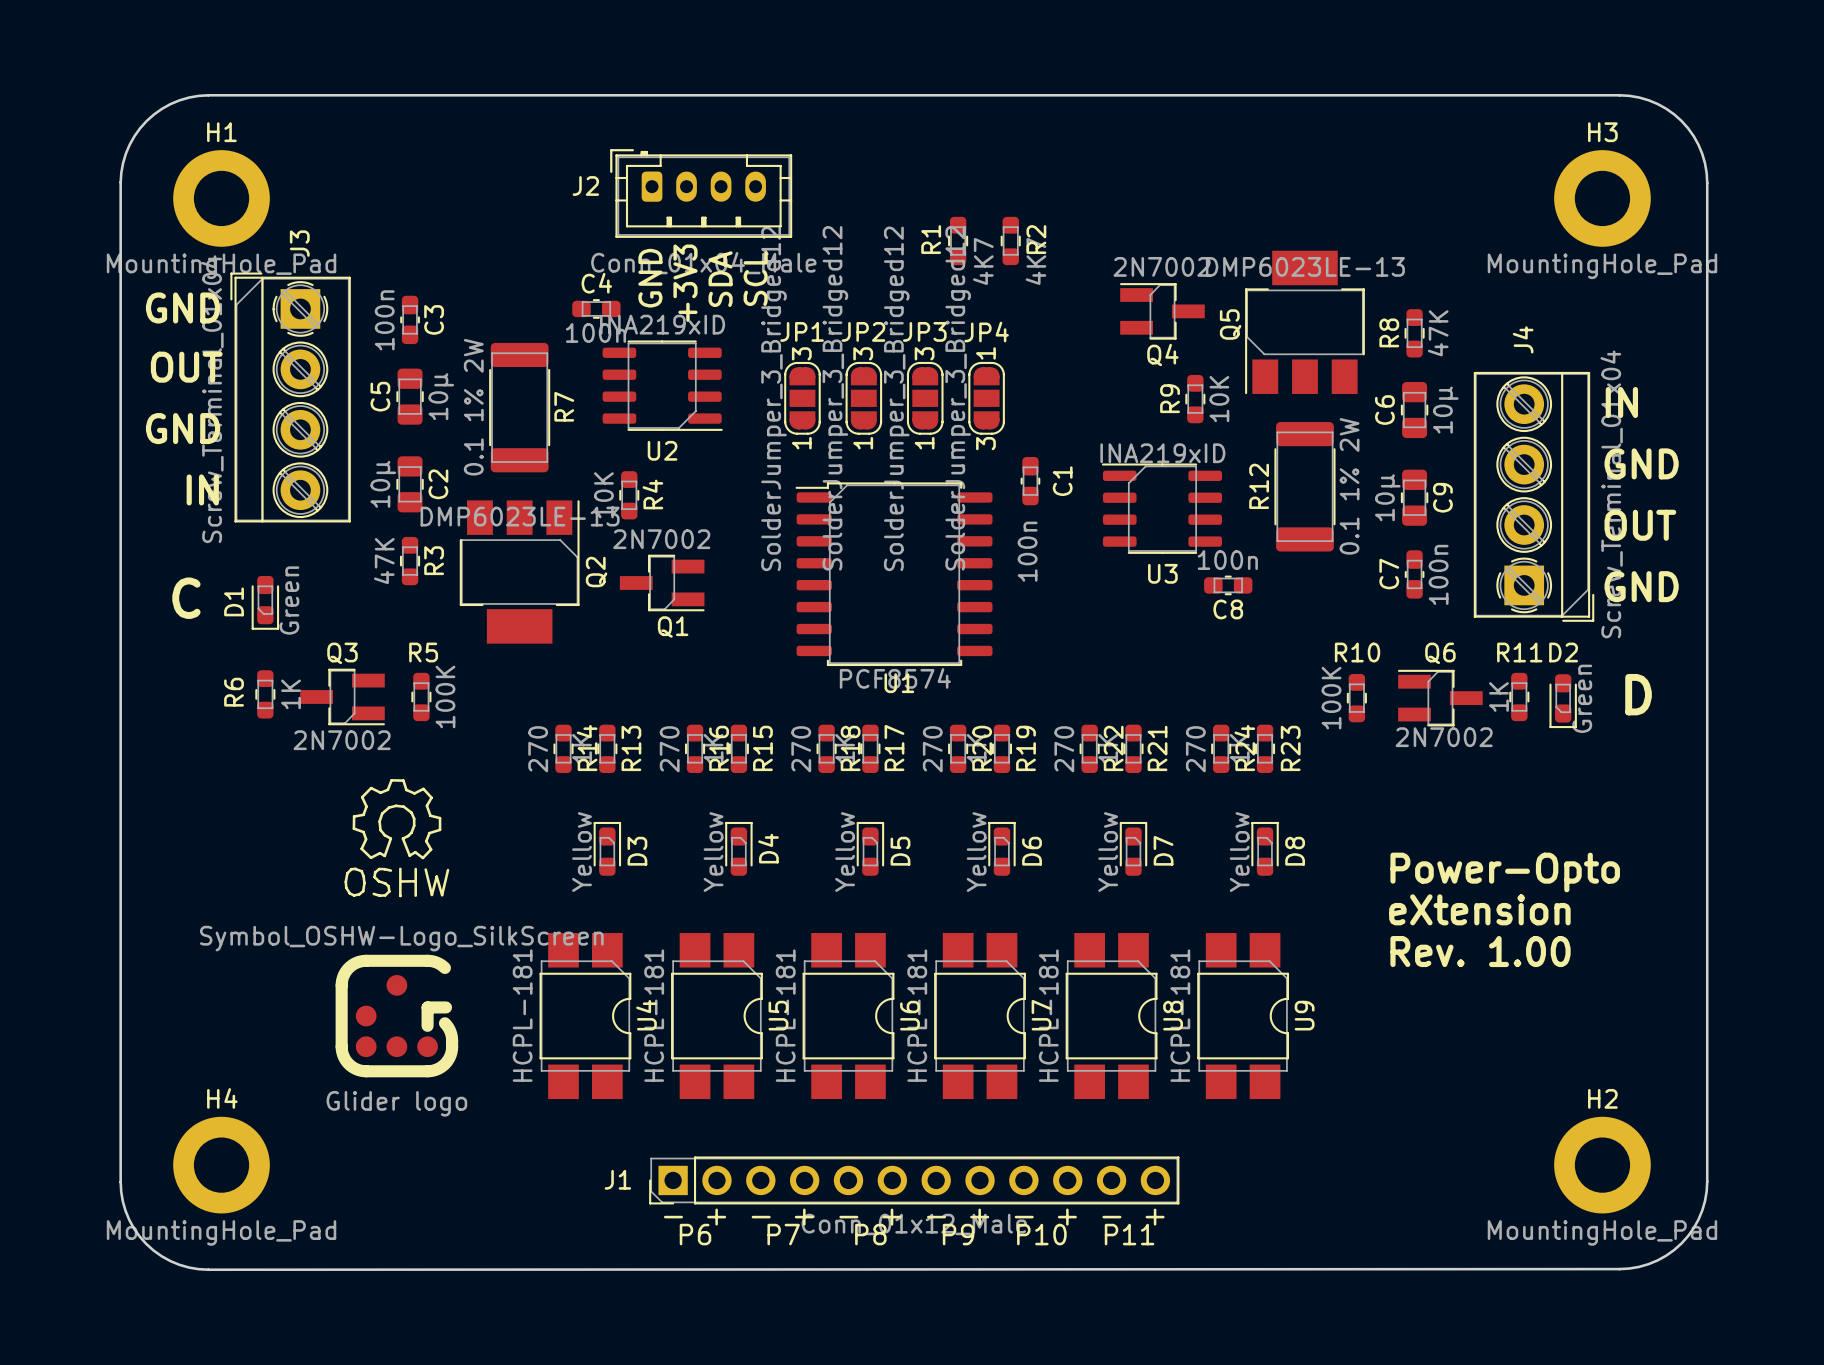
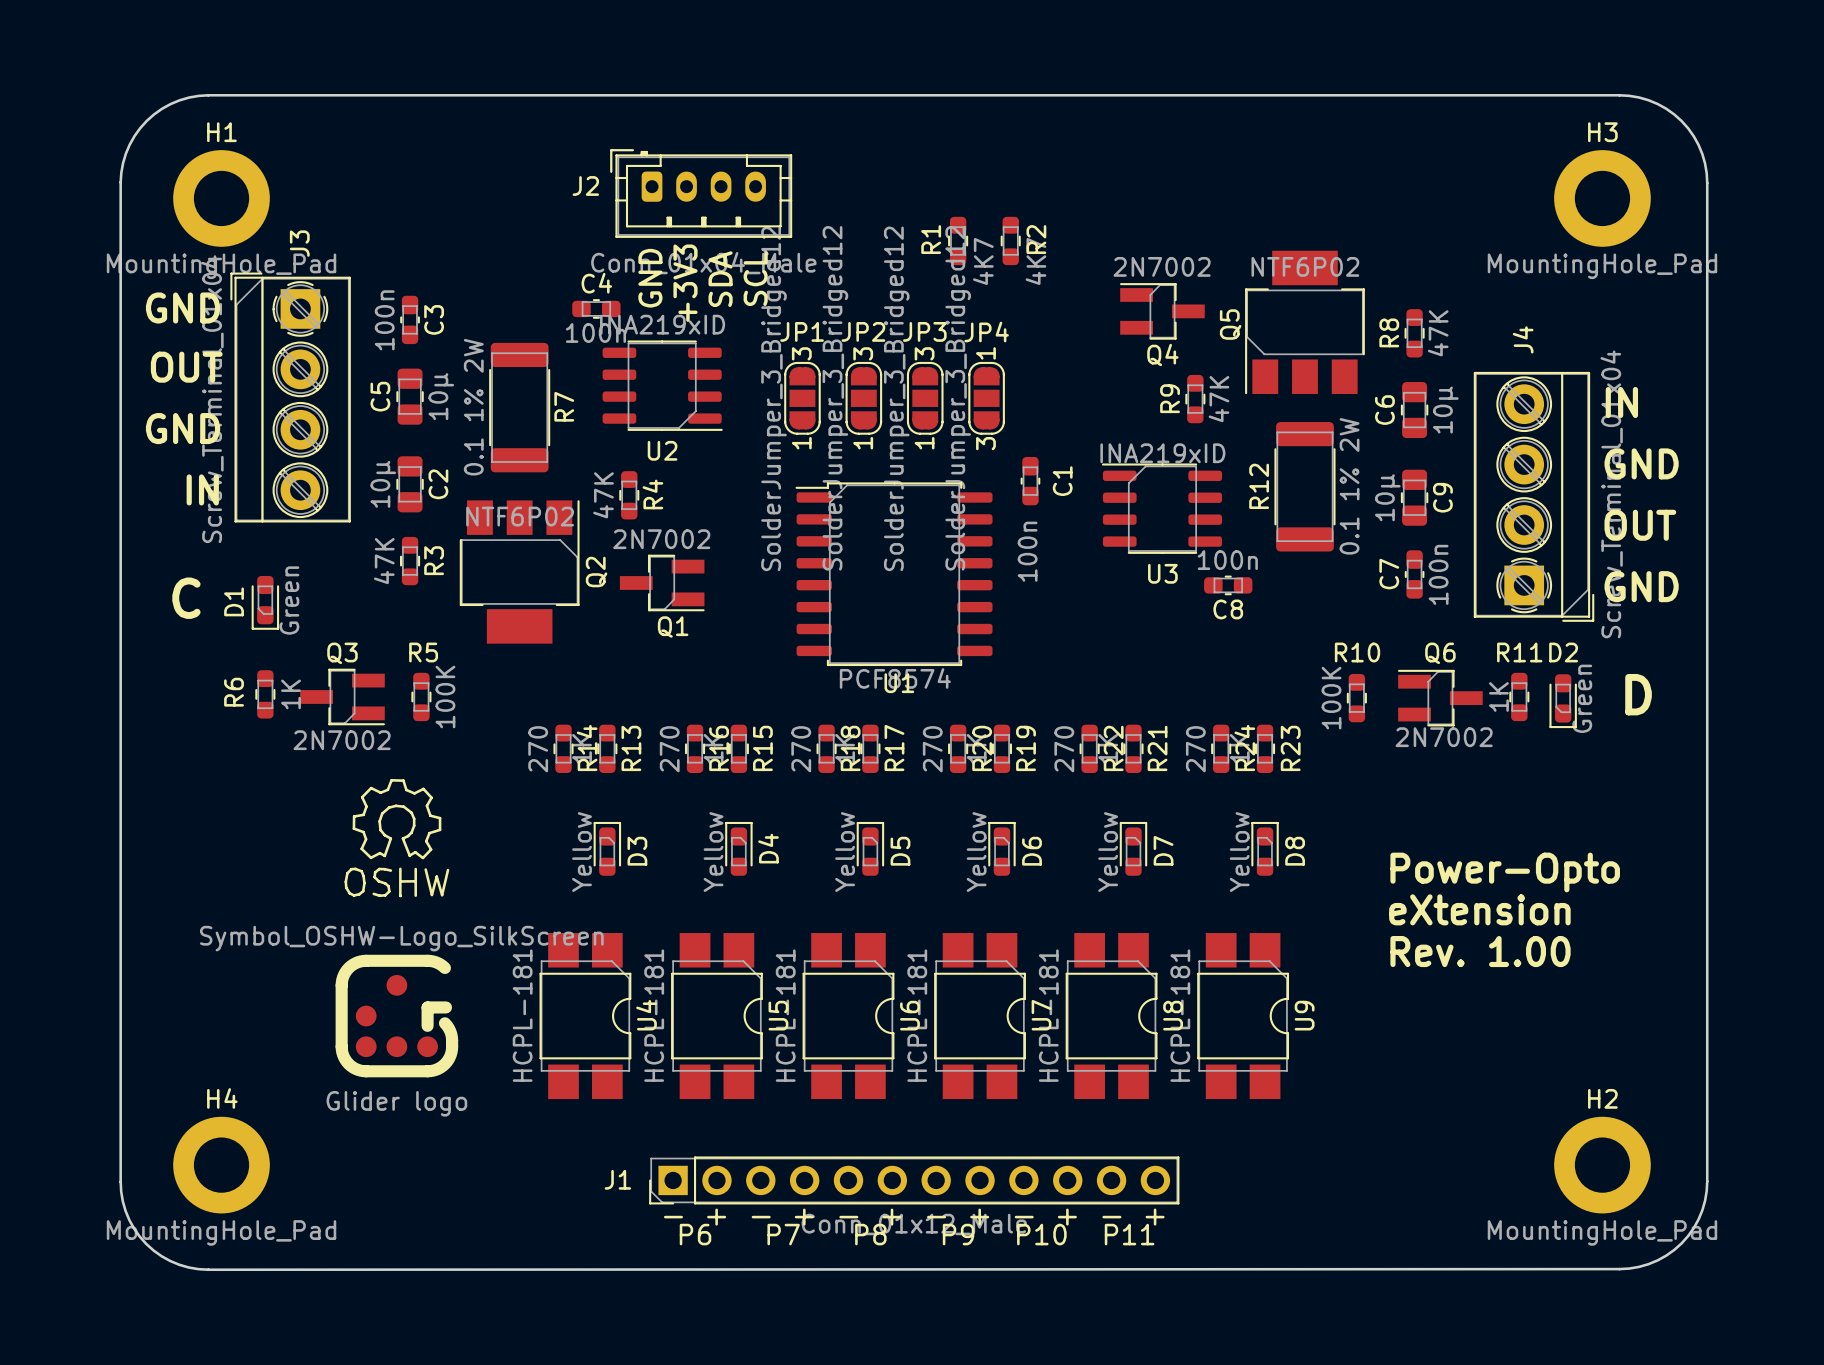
Q5 value: DMP6023LE-13 (1305, 266) -> NTF6P02 (1305, 266)
R9 value: 10K (1219, 399) -> 47K (1218, 399)
R4 value: 10K (603, 495) -> 47K (603, 495)
Q2 value: DMP6023LE-13 (520, 516) -> NTF6P02 (520, 516)

